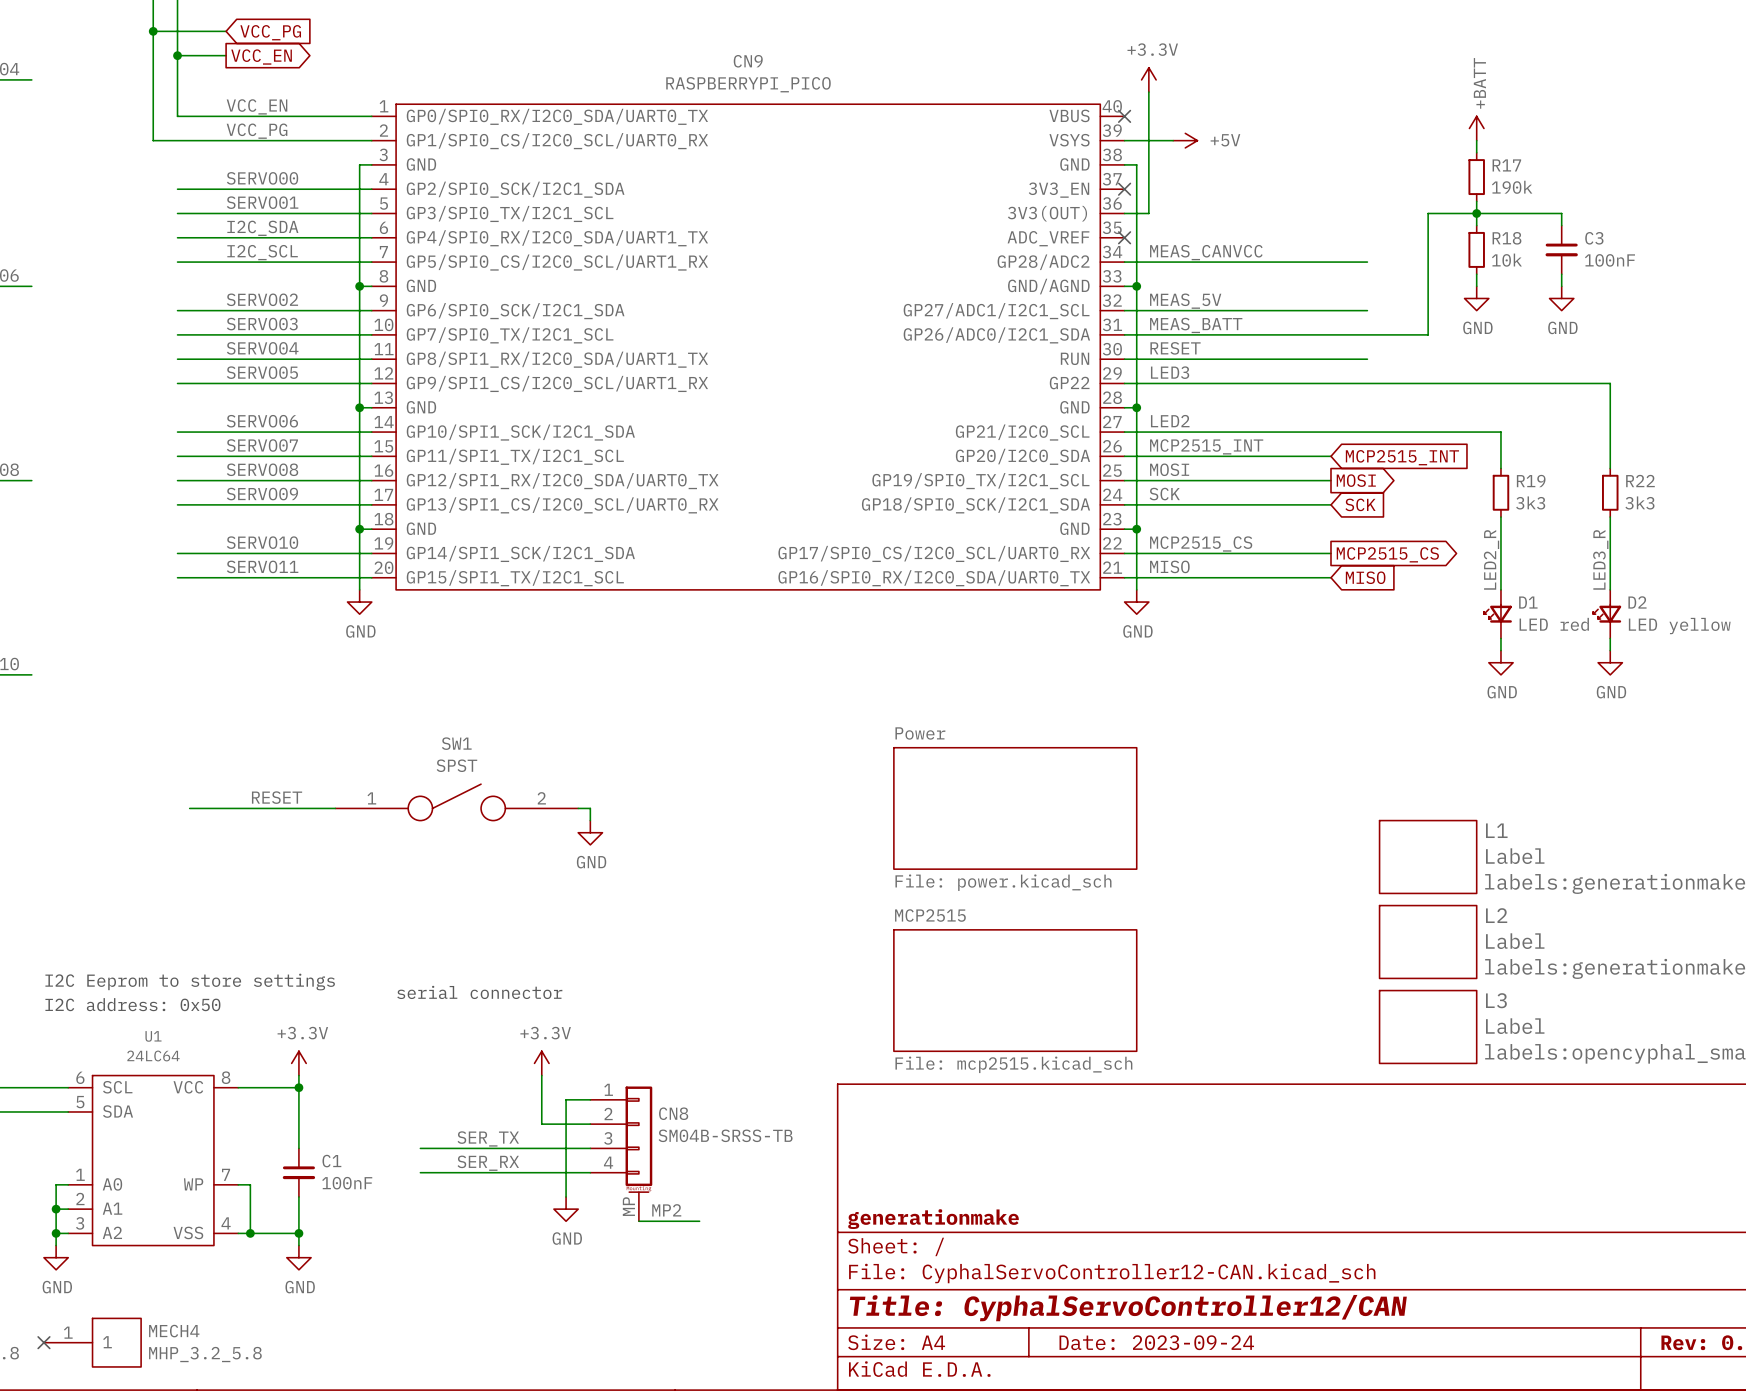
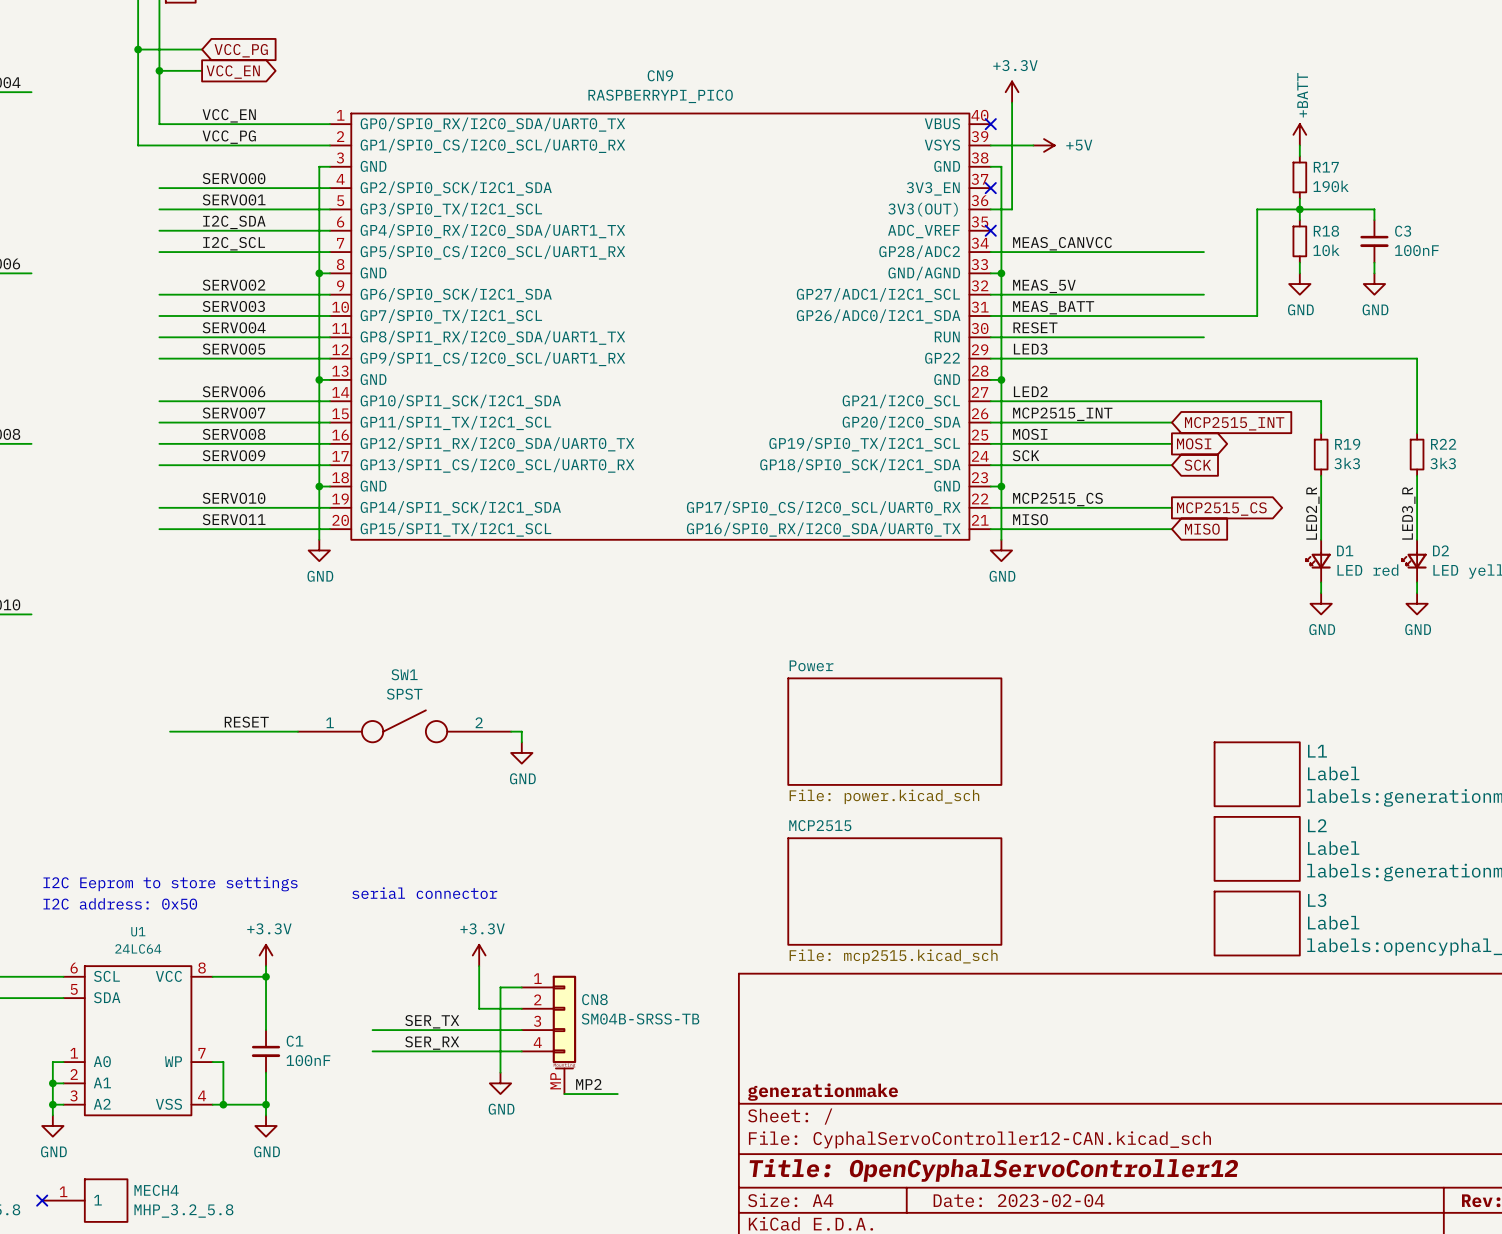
title block: Title: CyphalServoController12/CAN (1128, 1308) -> Title: OpenCyphalServoController12 (993, 1170)
title block: Date: 2023-09-24 (1156, 1342) -> Date: 2023-02-04 (1019, 1200)

